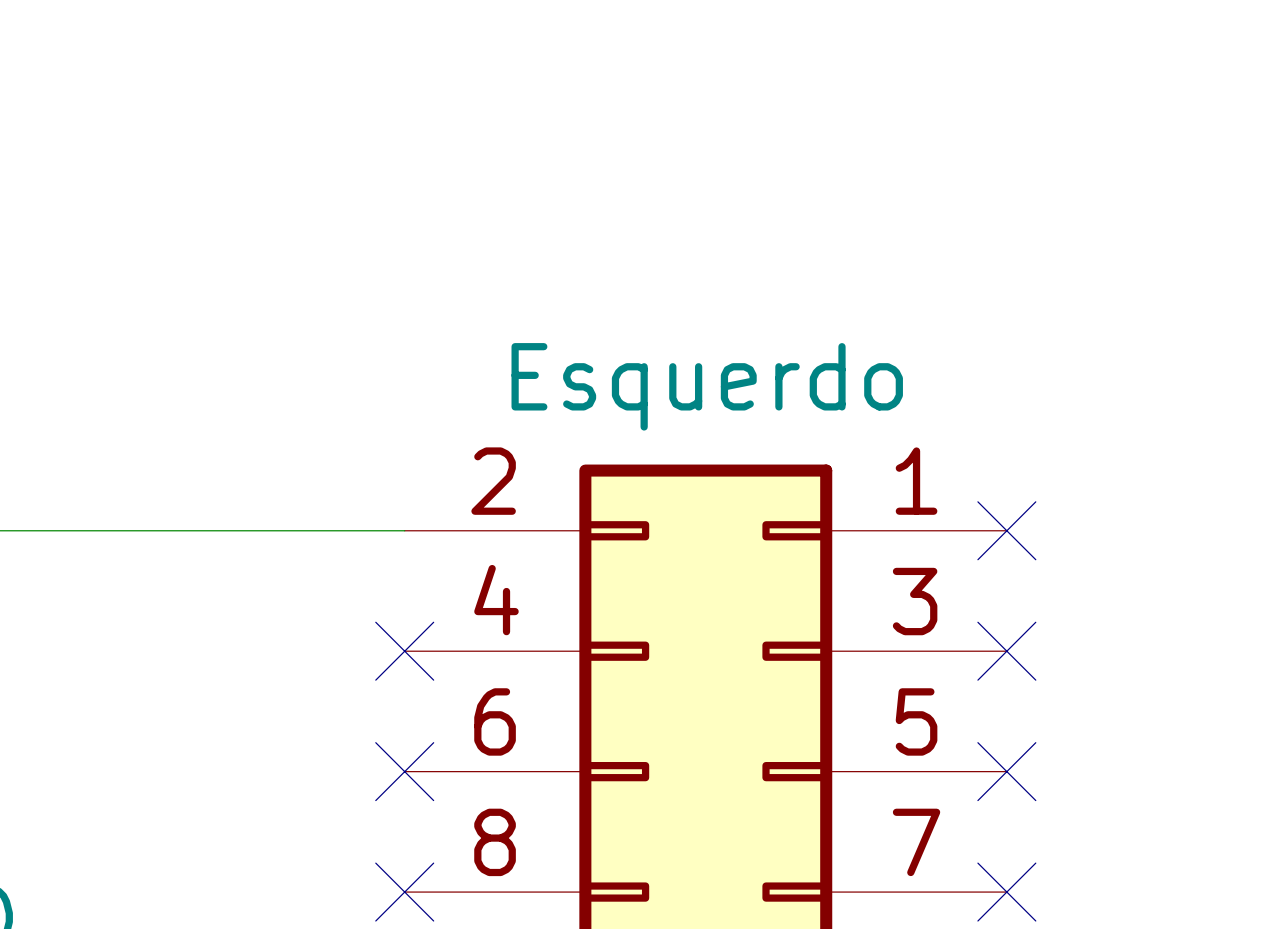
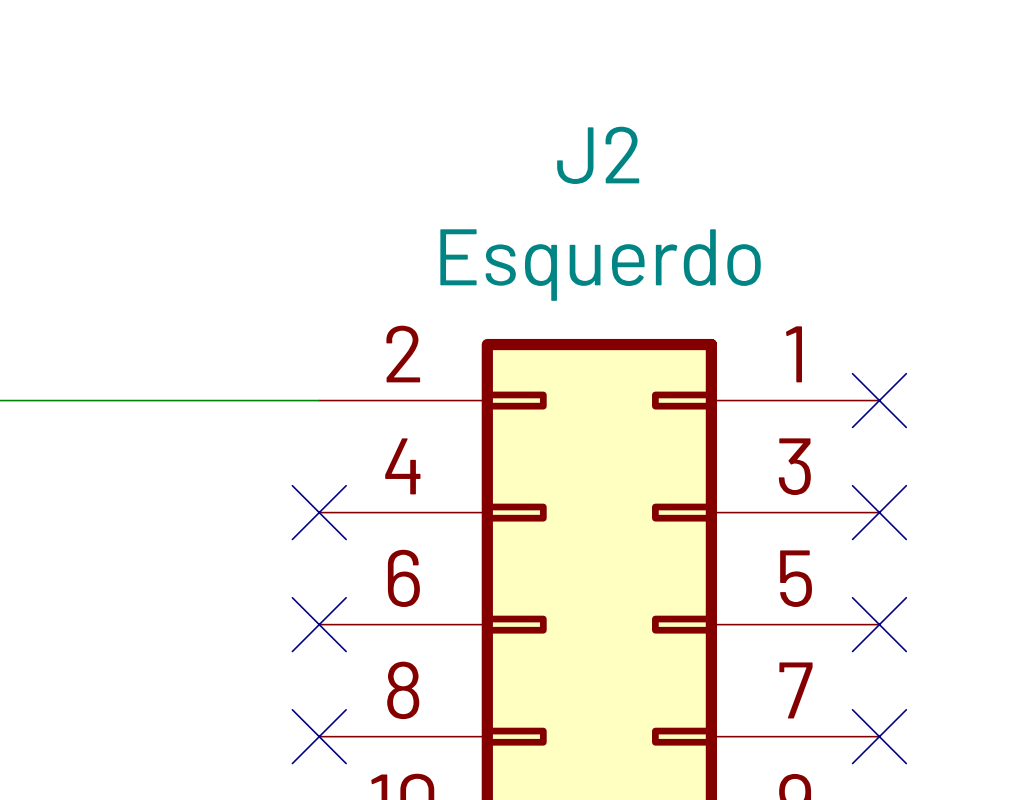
J2 name: none -> J2 (598, 155)

